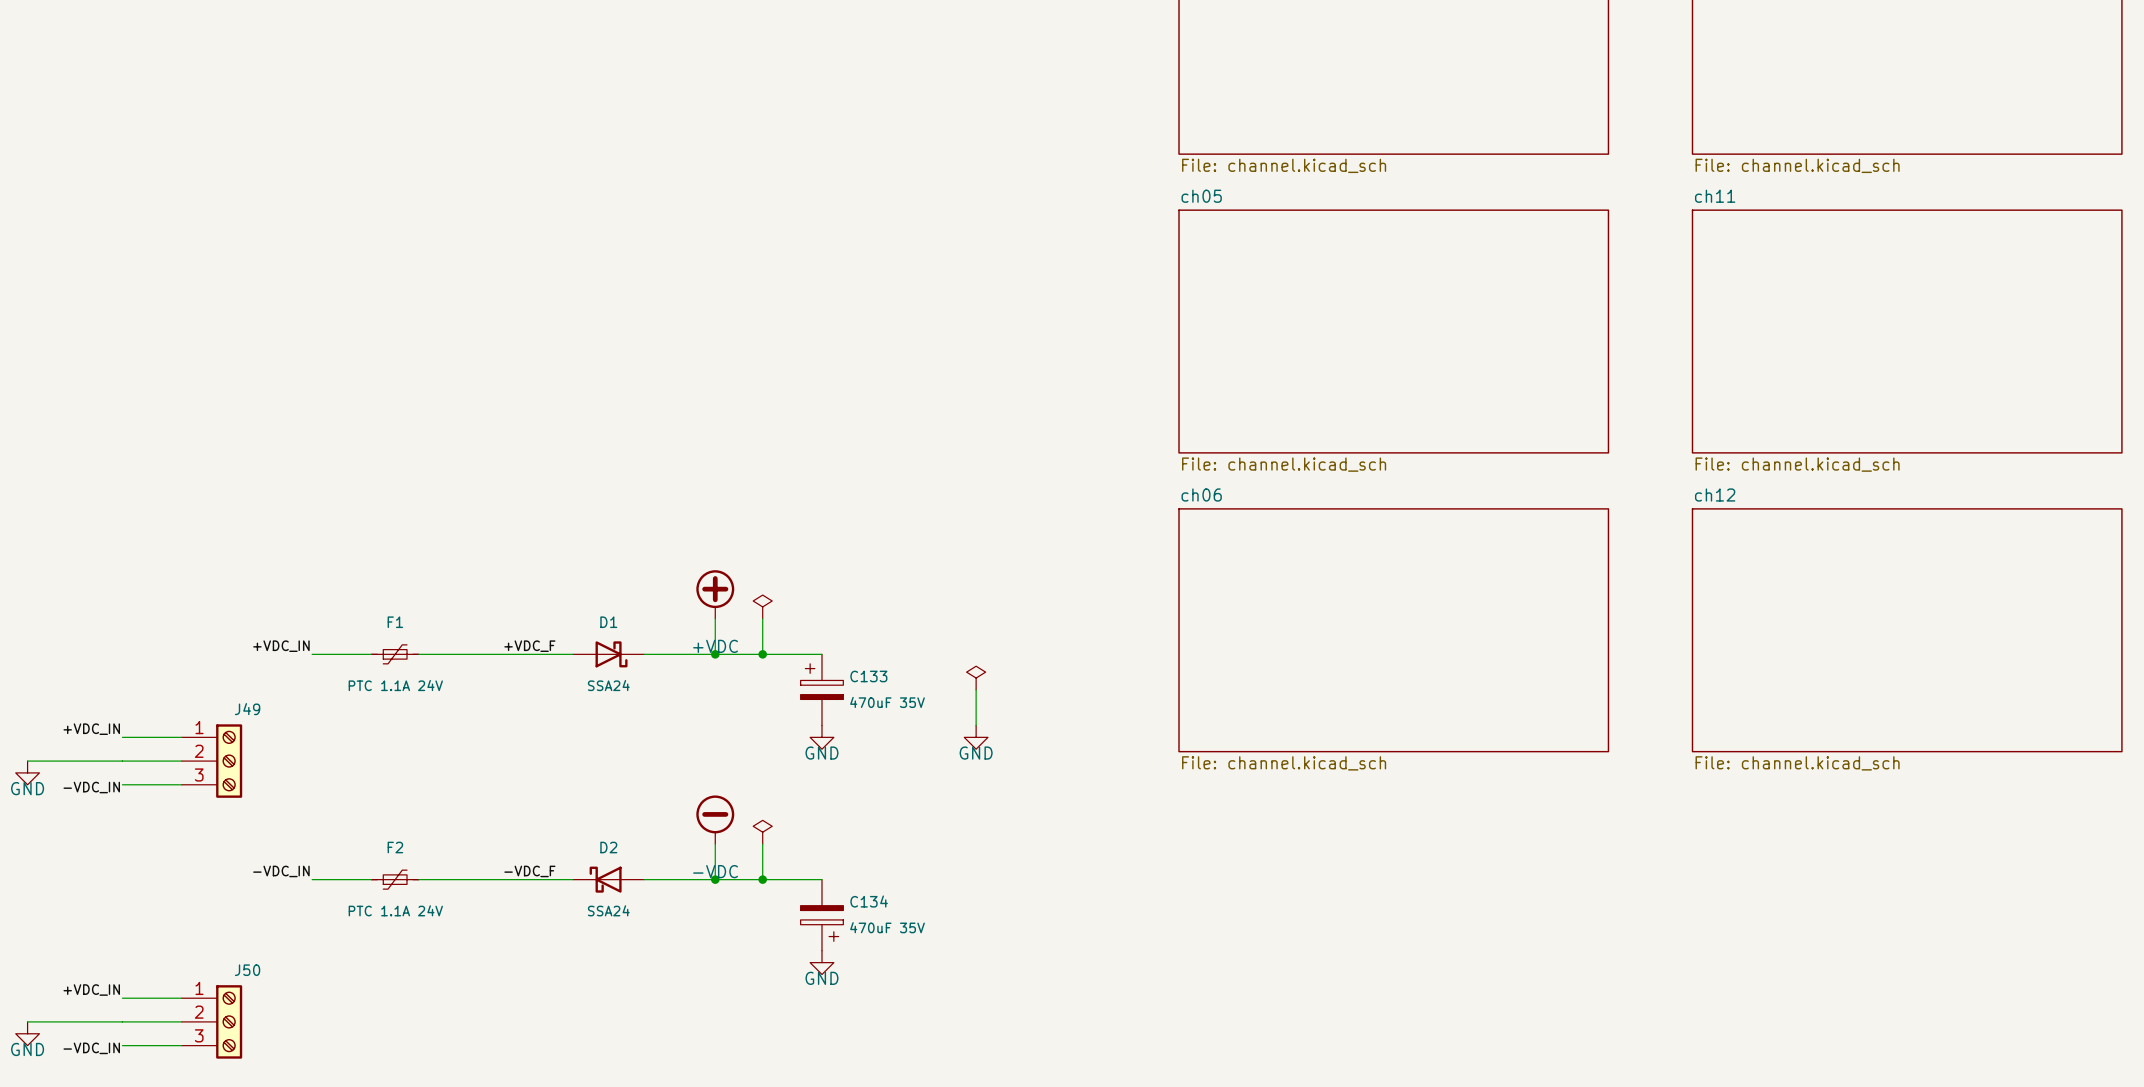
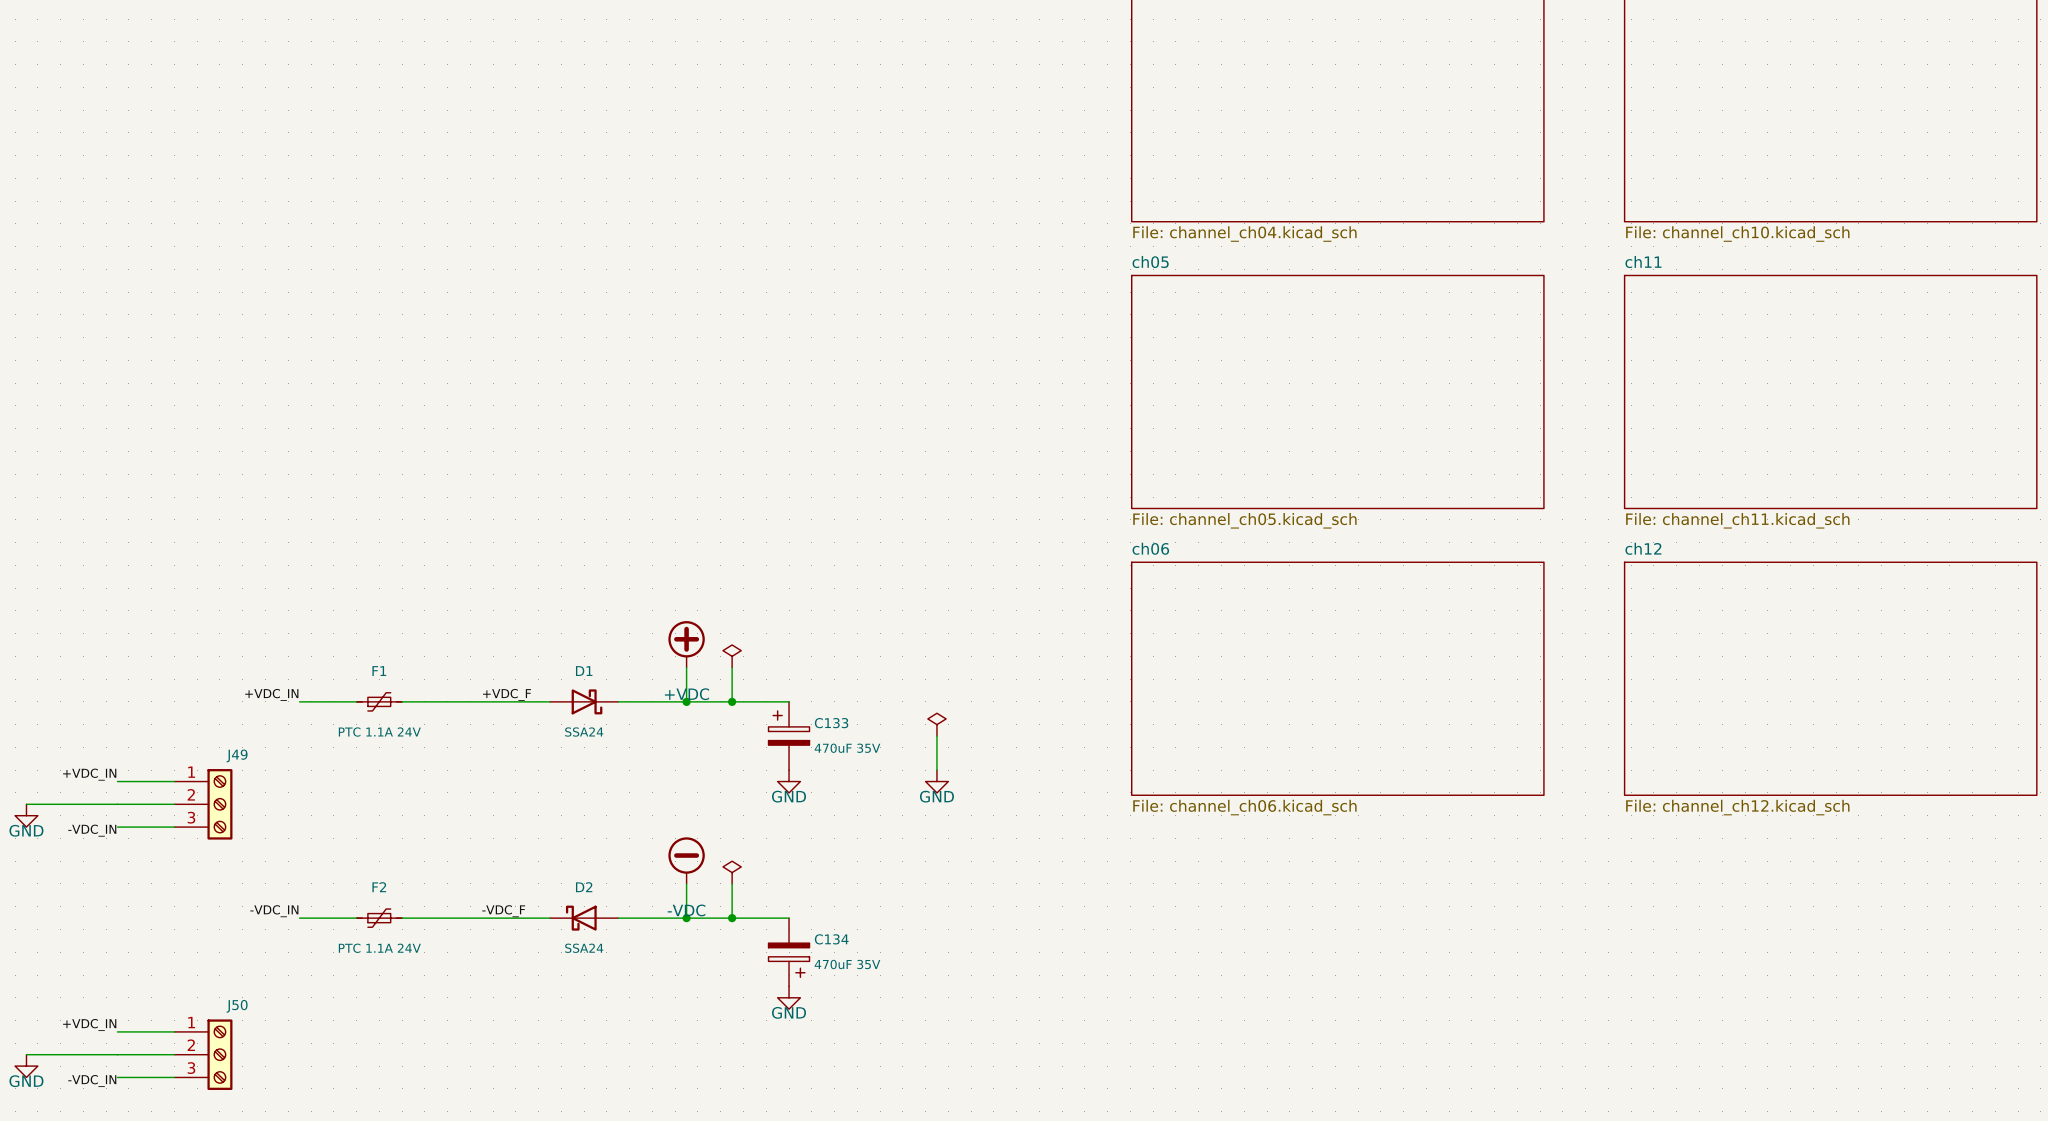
sheet value: File: channel.kicad_sch (1284, 165) -> File: channel_ch04.kicad_sch (1244, 234)
sheet value: File: channel.kicad_sch (1797, 165) -> File: channel_ch10.kicad_sch (1737, 234)
sheet ch05 value: File: channel.kicad_sch (1284, 464) -> File: channel_ch05.kicad_sch (1244, 520)
sheet ch11 value: File: channel.kicad_sch (1797, 464) -> File: channel_ch11.kicad_sch (1737, 520)
sheet ch06 value: File: channel.kicad_sch (1284, 763) -> File: channel_ch06.kicad_sch (1244, 807)
sheet ch12 value: File: channel.kicad_sch (1797, 763) -> File: channel_ch12.kicad_sch (1737, 807)

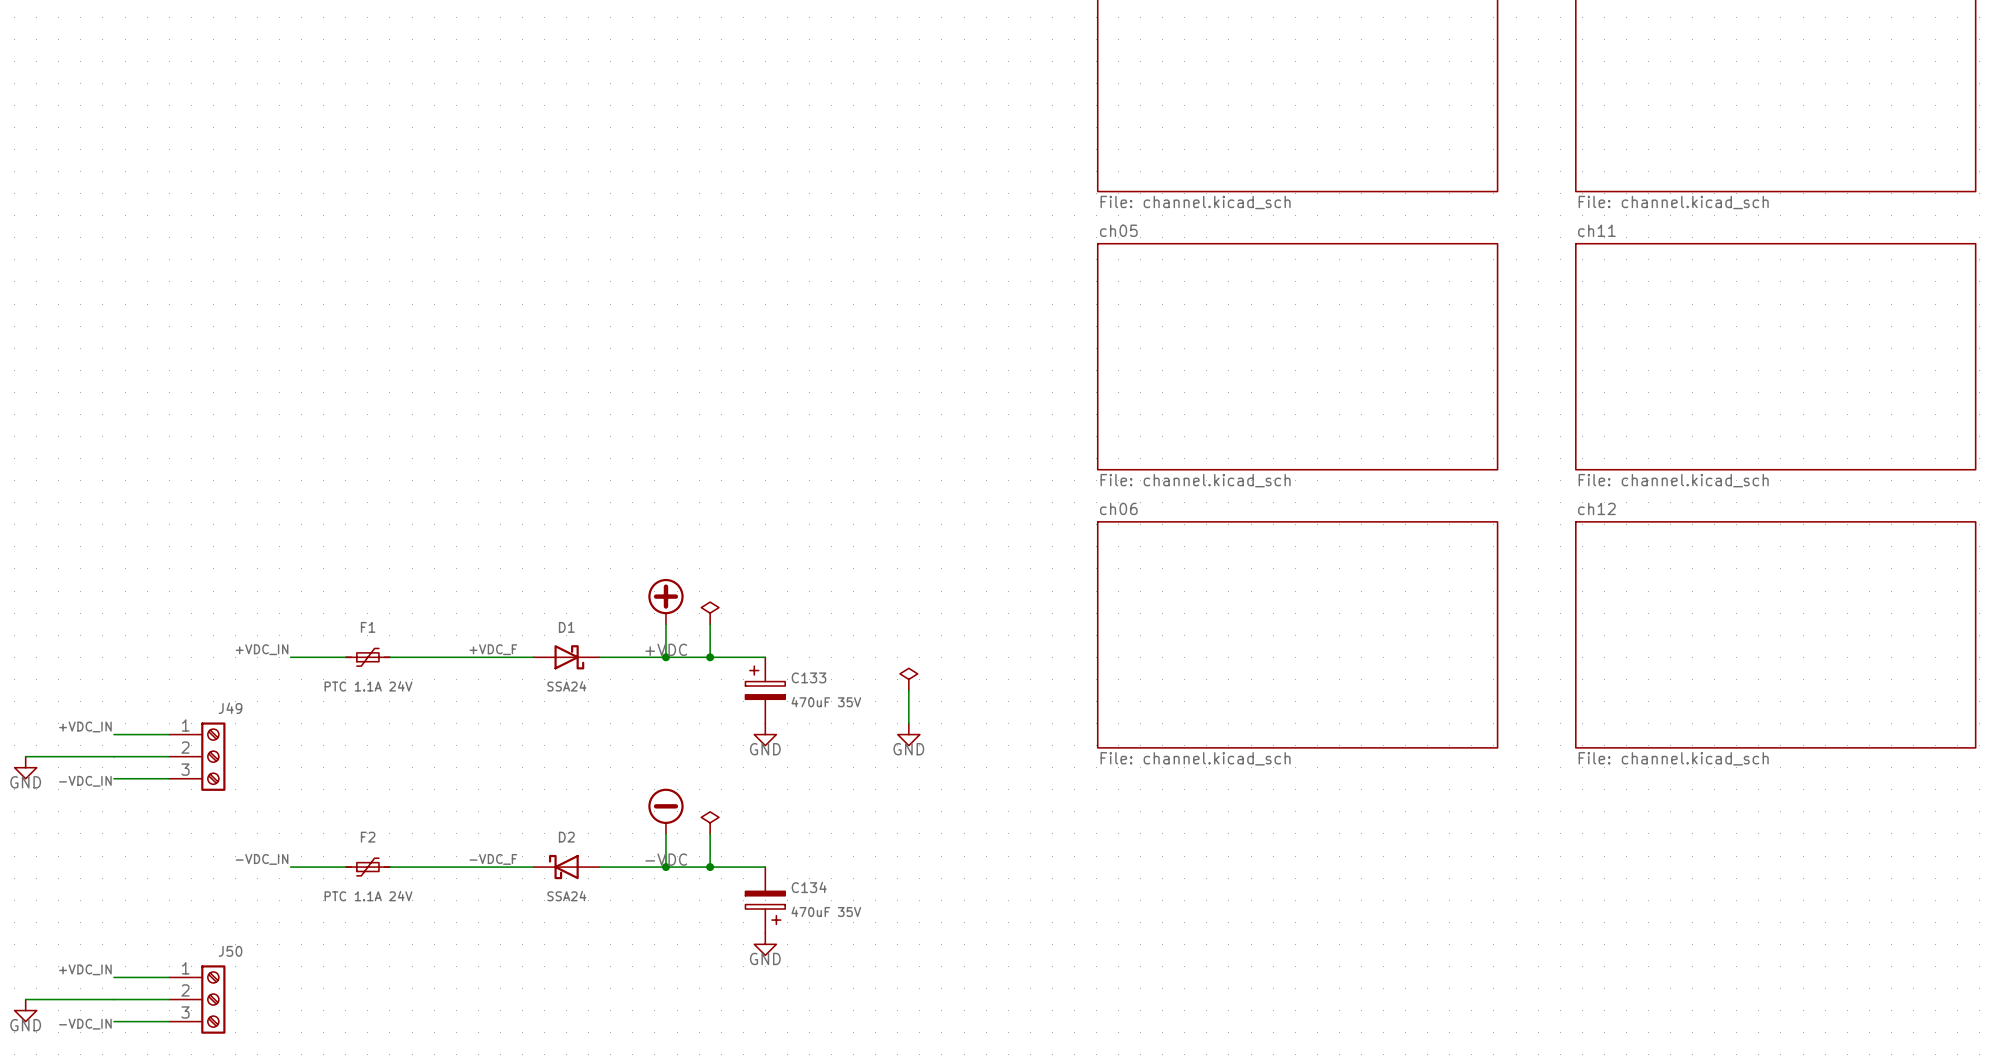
sheet value: File: channel_ch04.kicad_sch (1244, 234) -> File: channel.kicad_sch (1195, 202)
sheet value: File: channel_ch10.kicad_sch (1737, 234) -> File: channel.kicad_sch (1673, 202)
sheet ch05 value: File: channel_ch05.kicad_sch (1244, 520) -> File: channel.kicad_sch (1195, 480)
sheet ch11 value: File: channel_ch11.kicad_sch (1737, 520) -> File: channel.kicad_sch (1673, 480)
sheet ch06 value: File: channel_ch06.kicad_sch (1244, 807) -> File: channel.kicad_sch (1195, 758)
sheet ch12 value: File: channel_ch12.kicad_sch (1737, 807) -> File: channel.kicad_sch (1673, 758)

